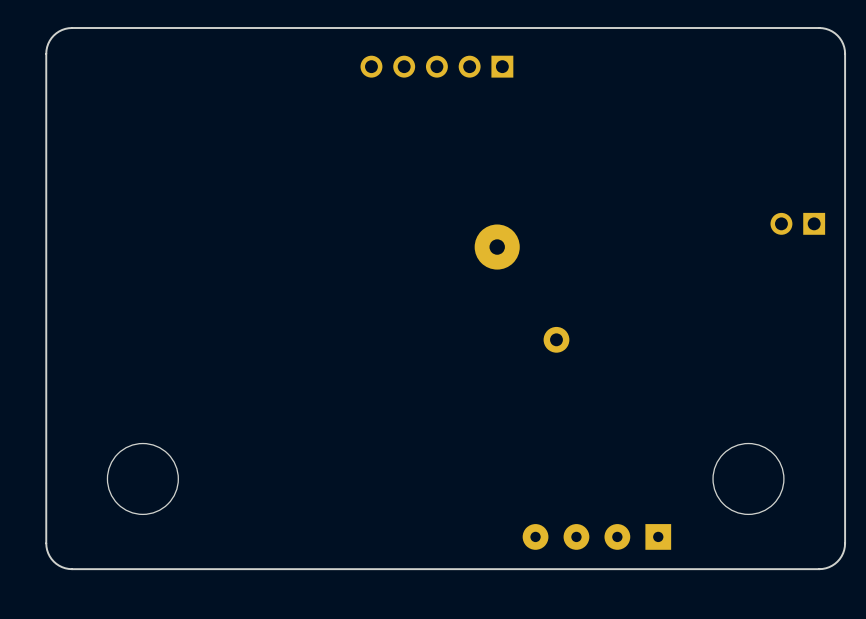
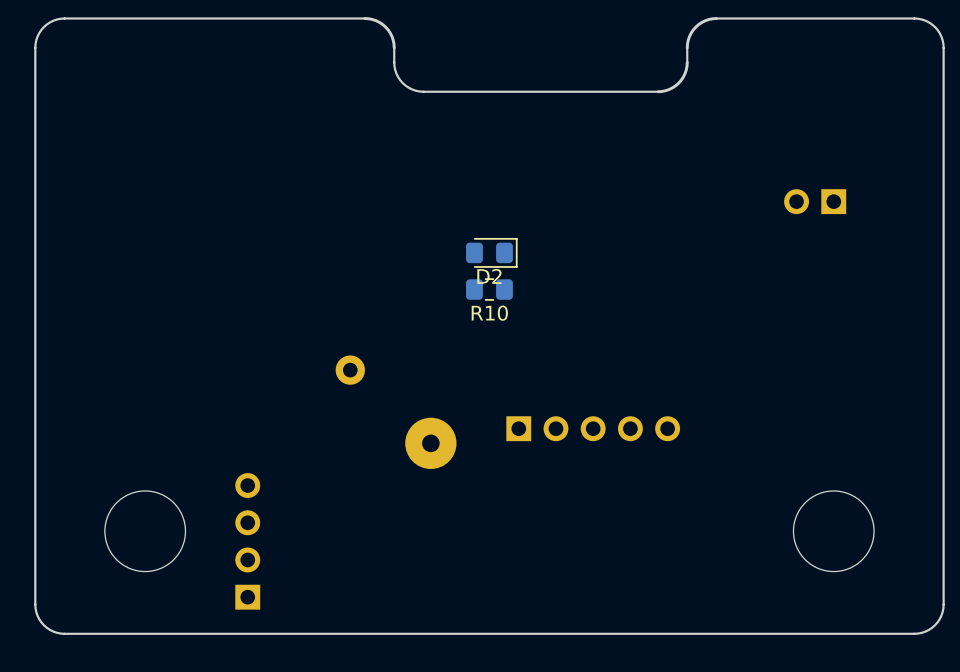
board edge: (645, 28) (336, 28) -> (716, 18) (701, 22) (693, 29) (688, 40) (687, 66) (683, 77) (672, 87) (657, 91) (415, 90) (405, 85) (396, 73) (394, 43) (388, 29) (379, 22) (364, 18)
part: (436, 66) -> none
part position: (797, 223) -> (815, 201)
D2: none -> (491, 252)
part position: (497, 247) -> (430, 443)
R10: none -> (489, 289)
part position: (556, 339) -> (350, 370)
part: none -> (593, 428)
part: none -> (247, 541)
part: (596, 536) -> none

